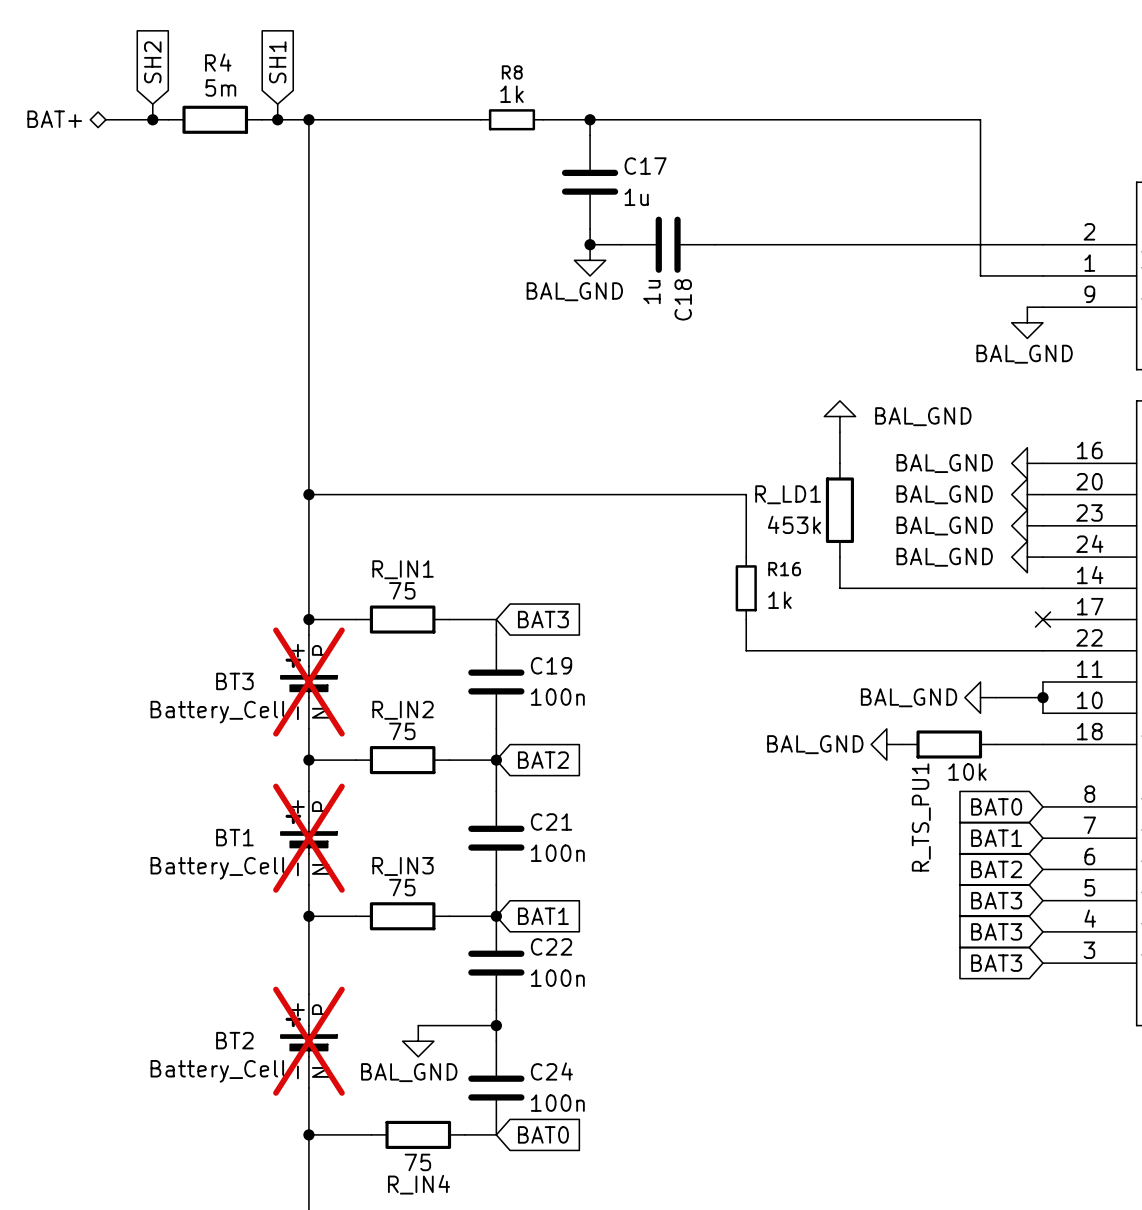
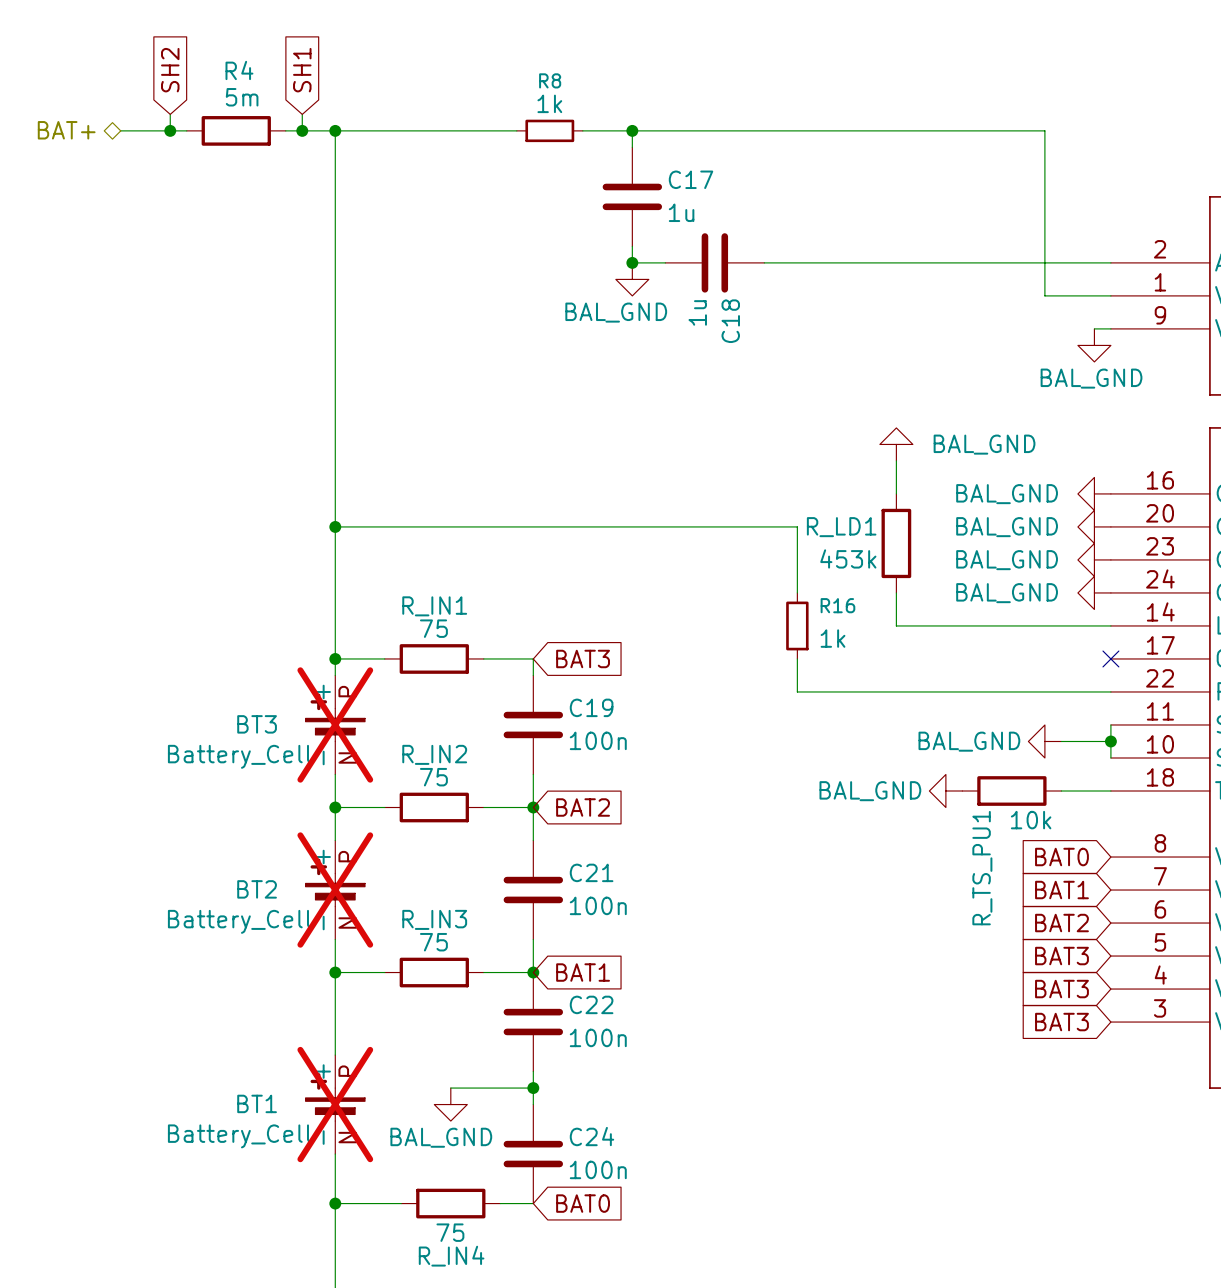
BT1 name: BT1 (234, 837) -> BT2 (257, 889)
BT2 name: BT2 (234, 1040) -> BT1 (257, 1103)

